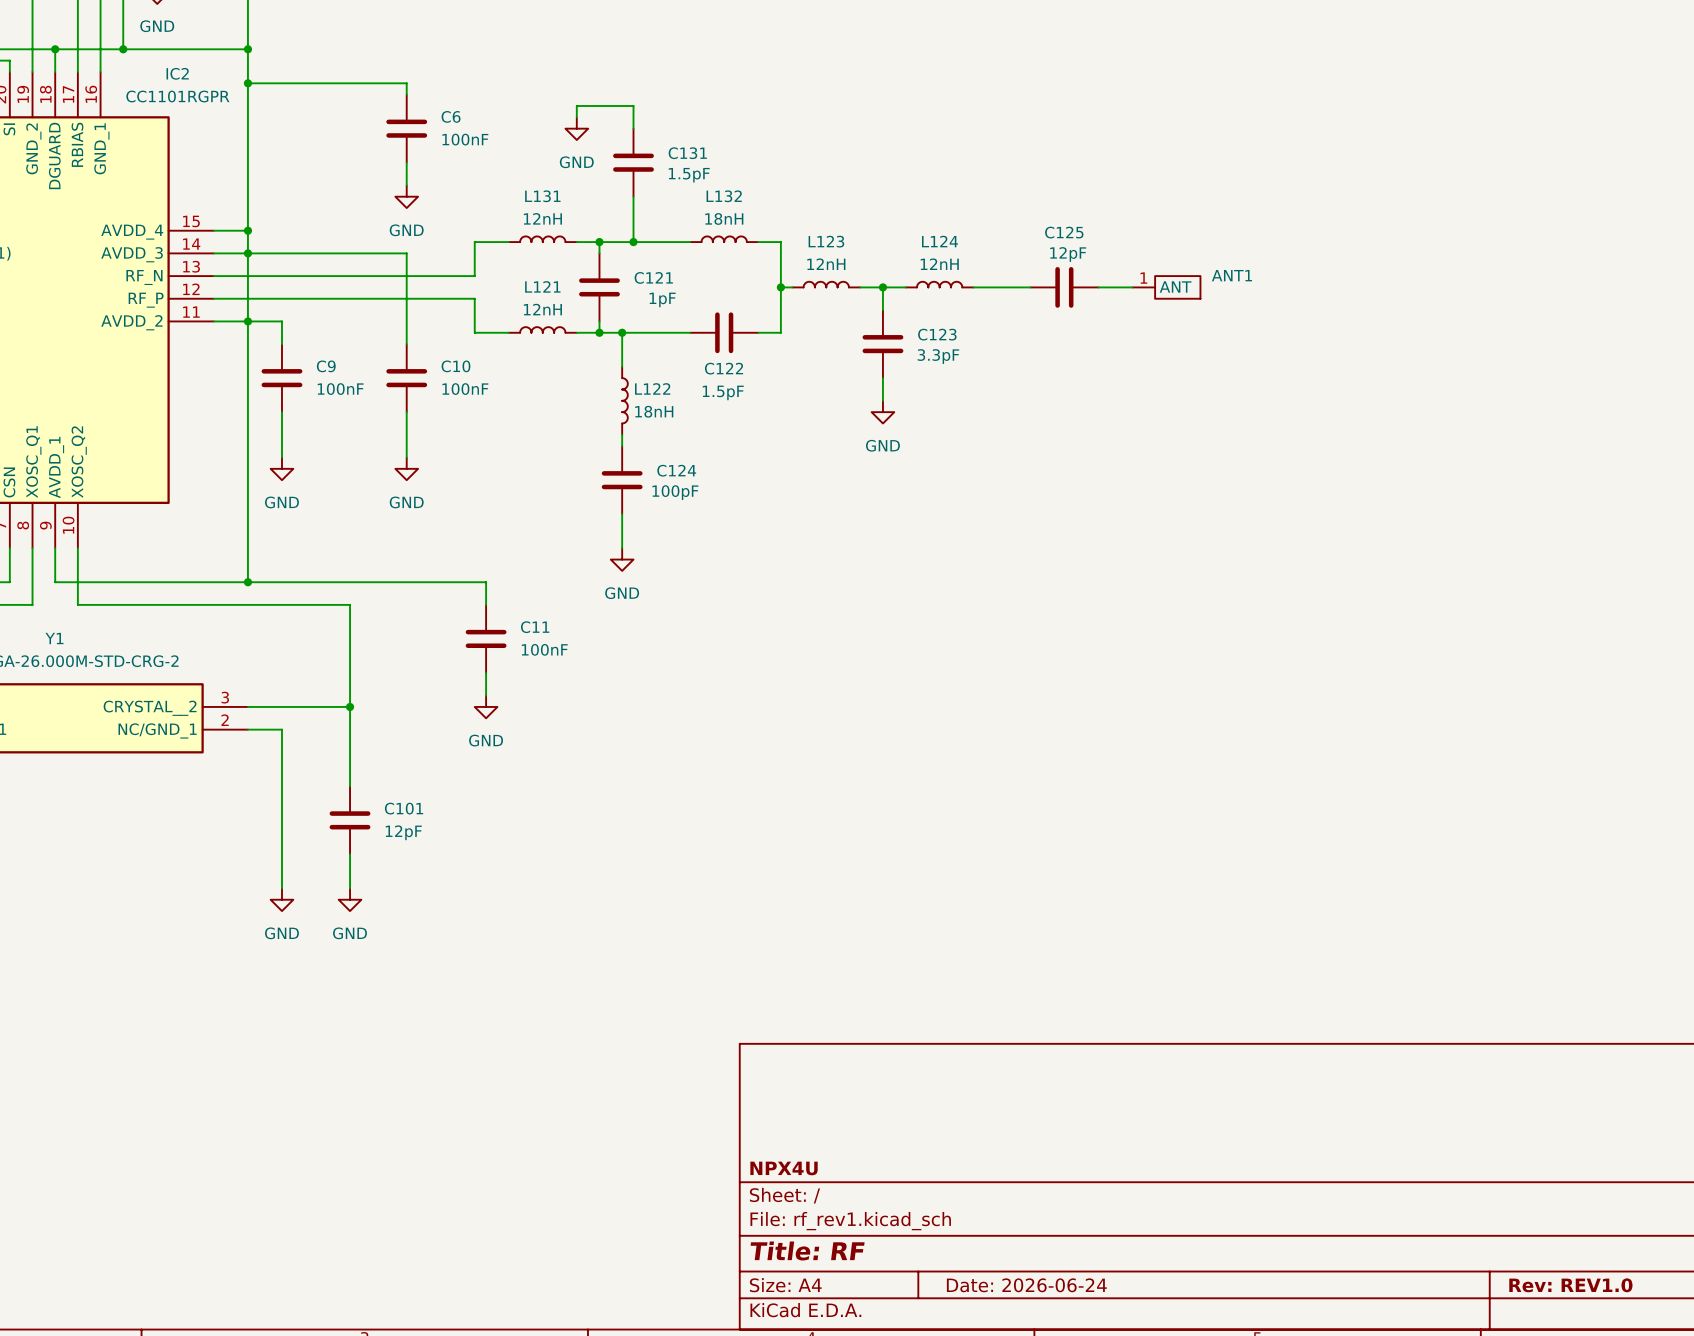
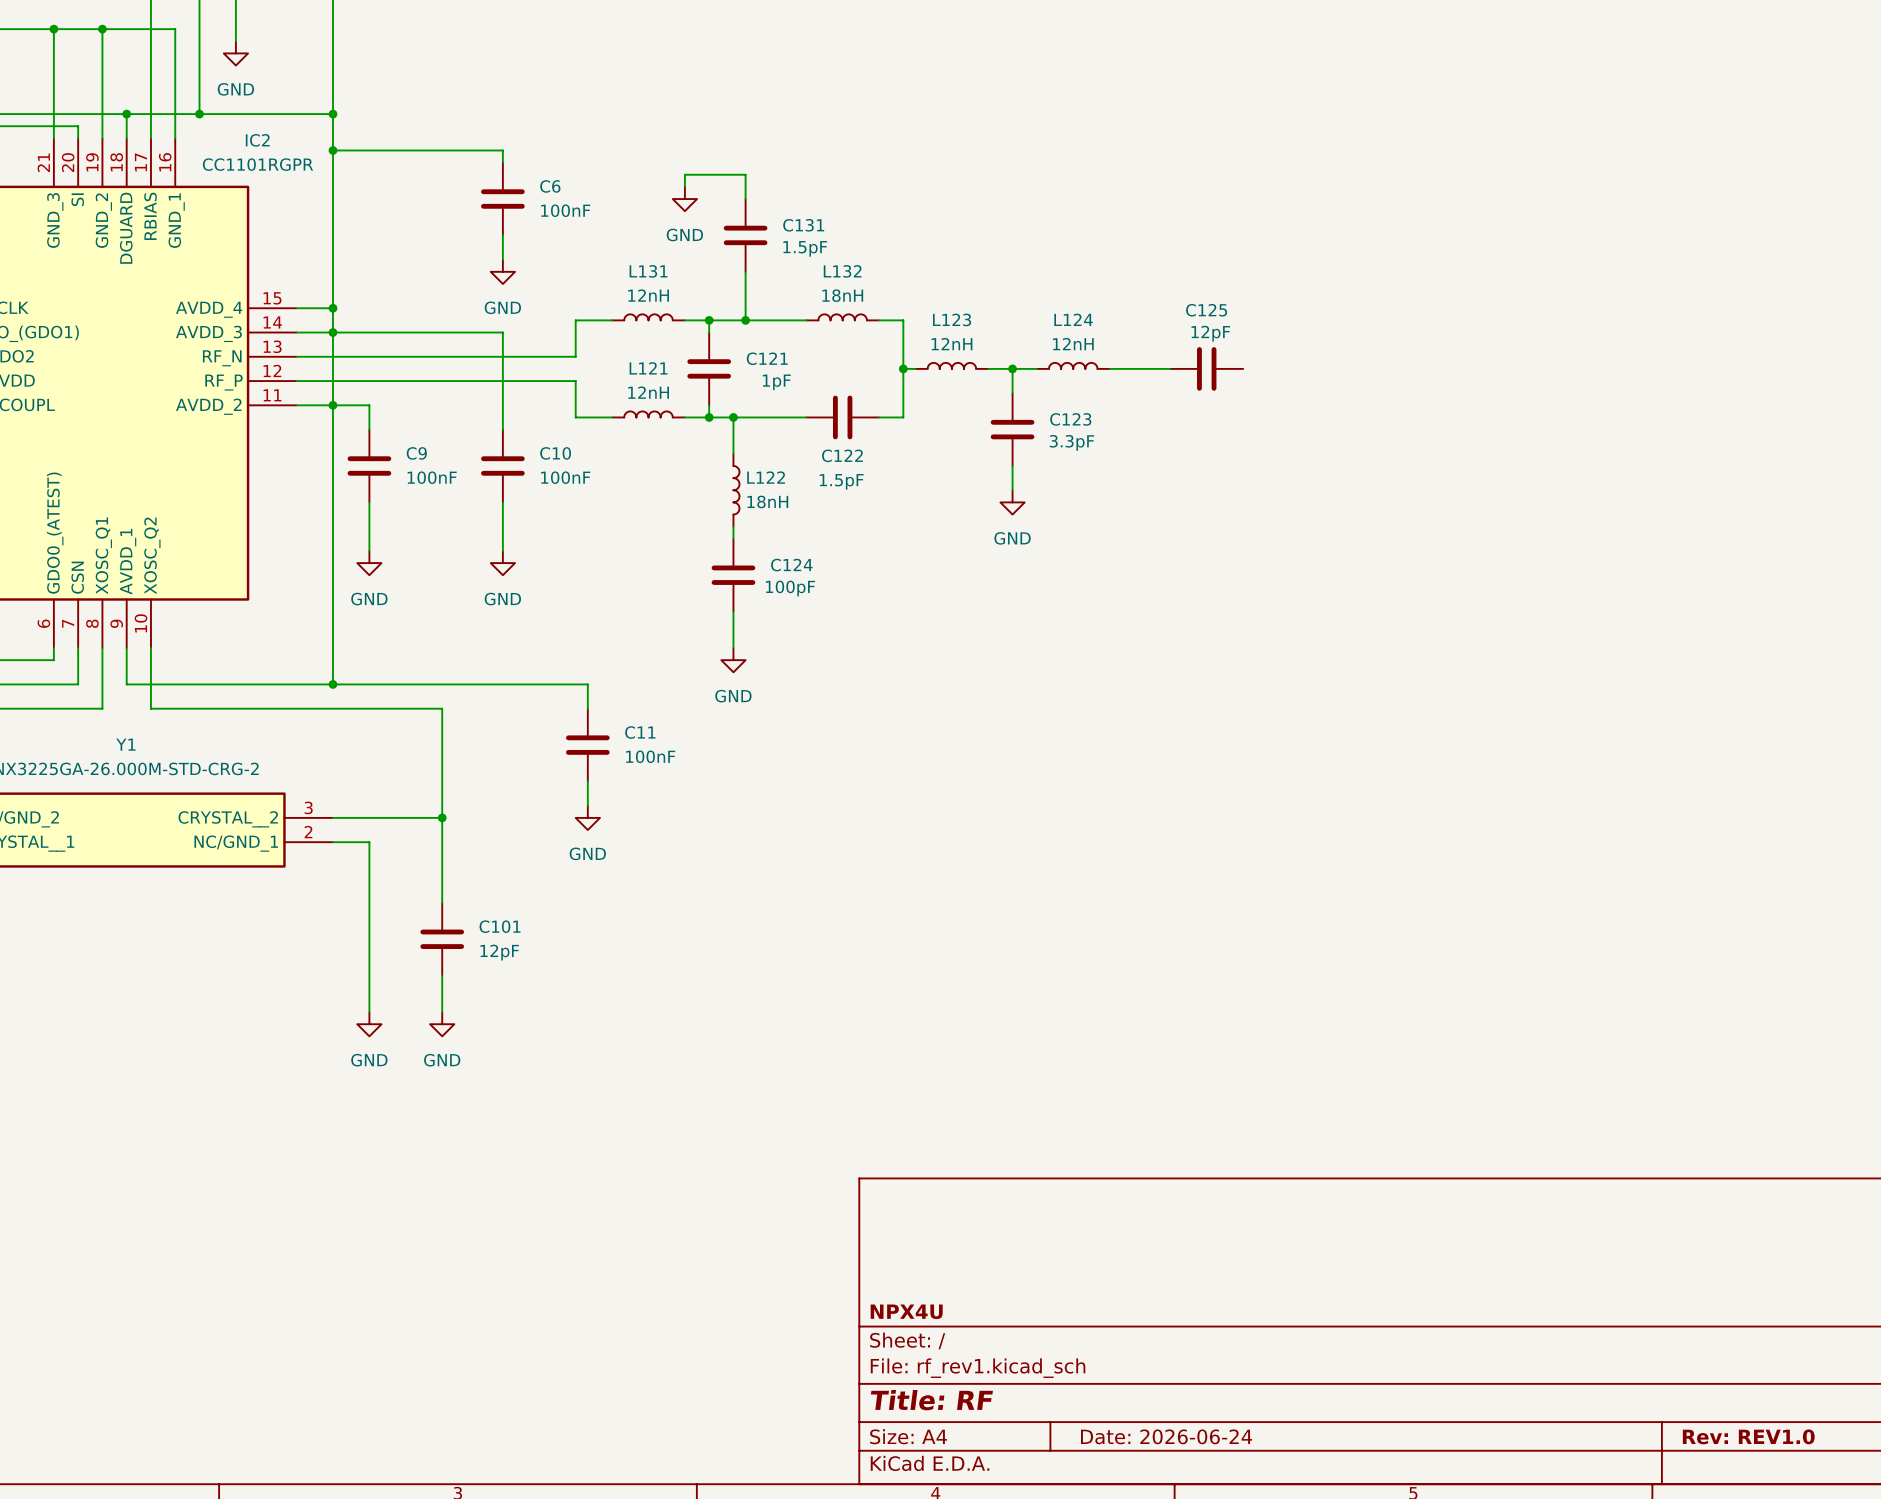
wire: (1098, 287) (1132, 287) -> none
ANT1: (1166, 287) -> none

